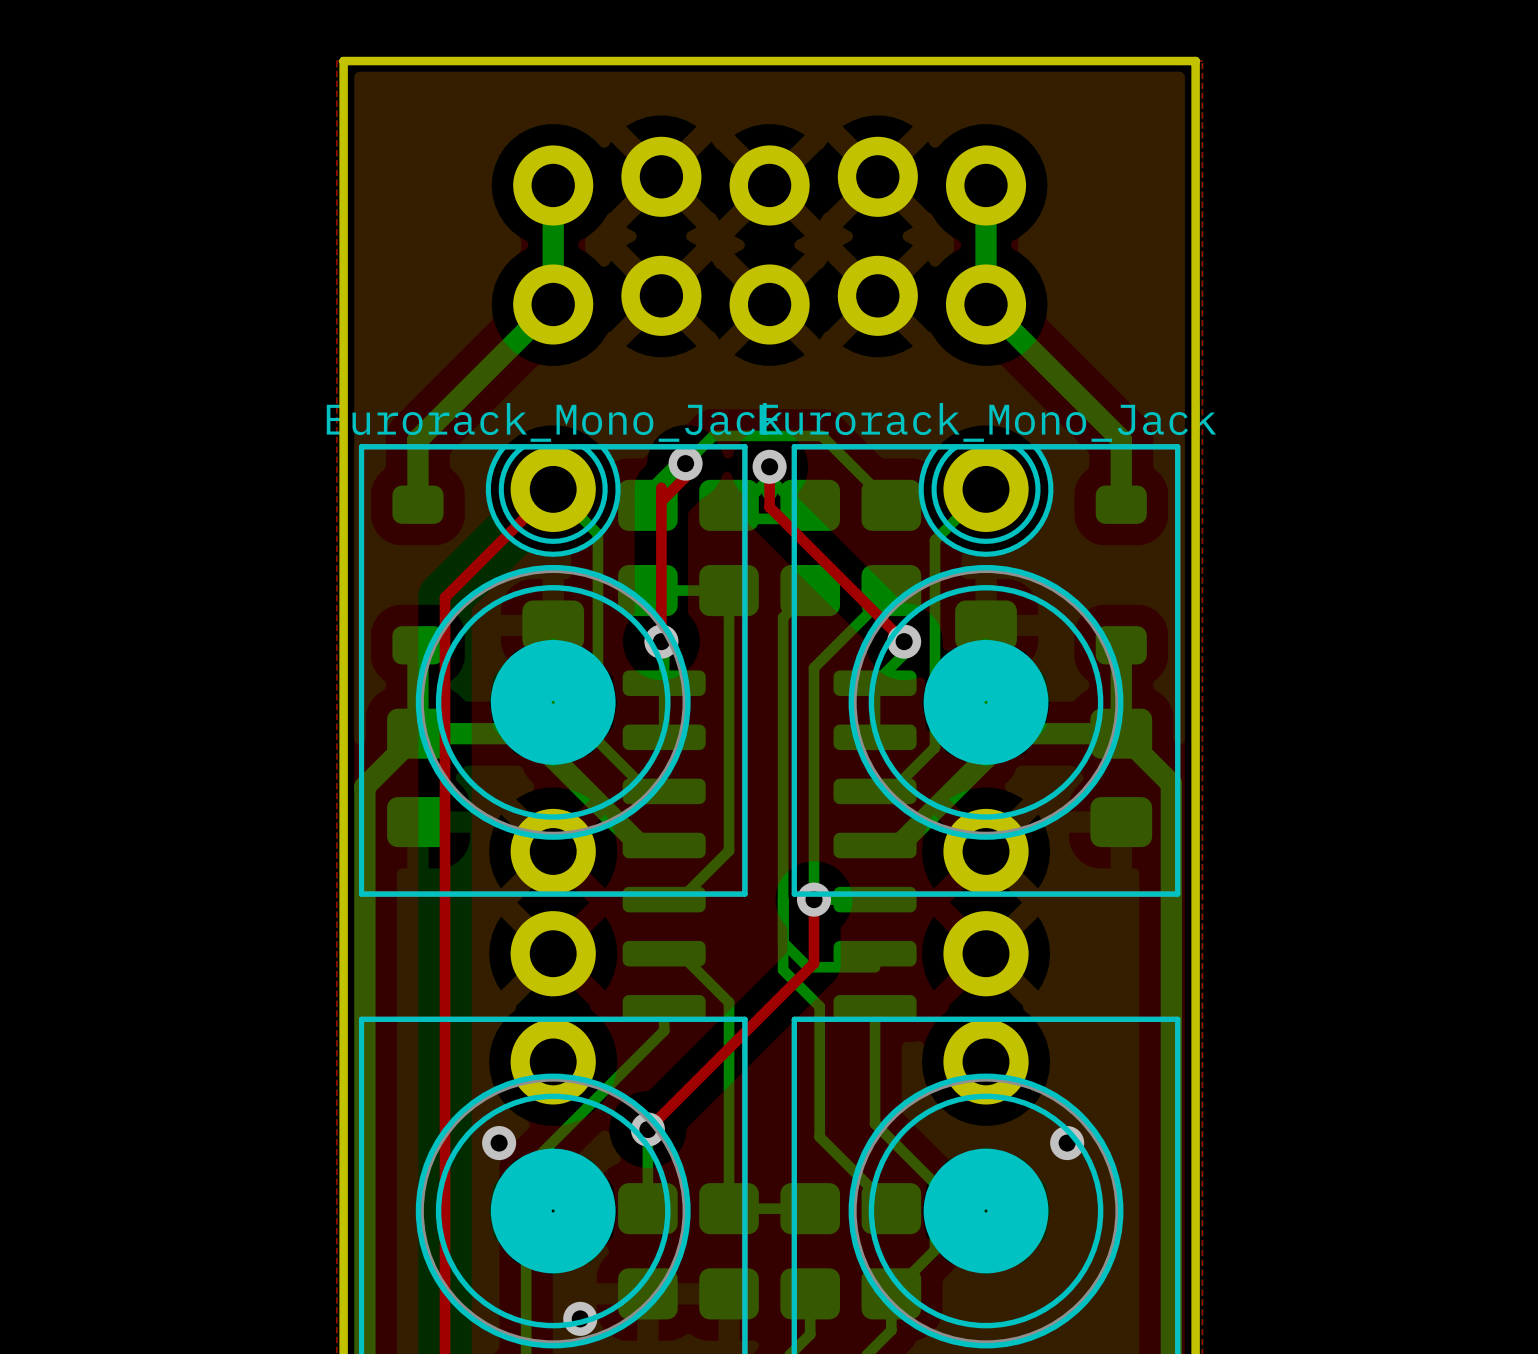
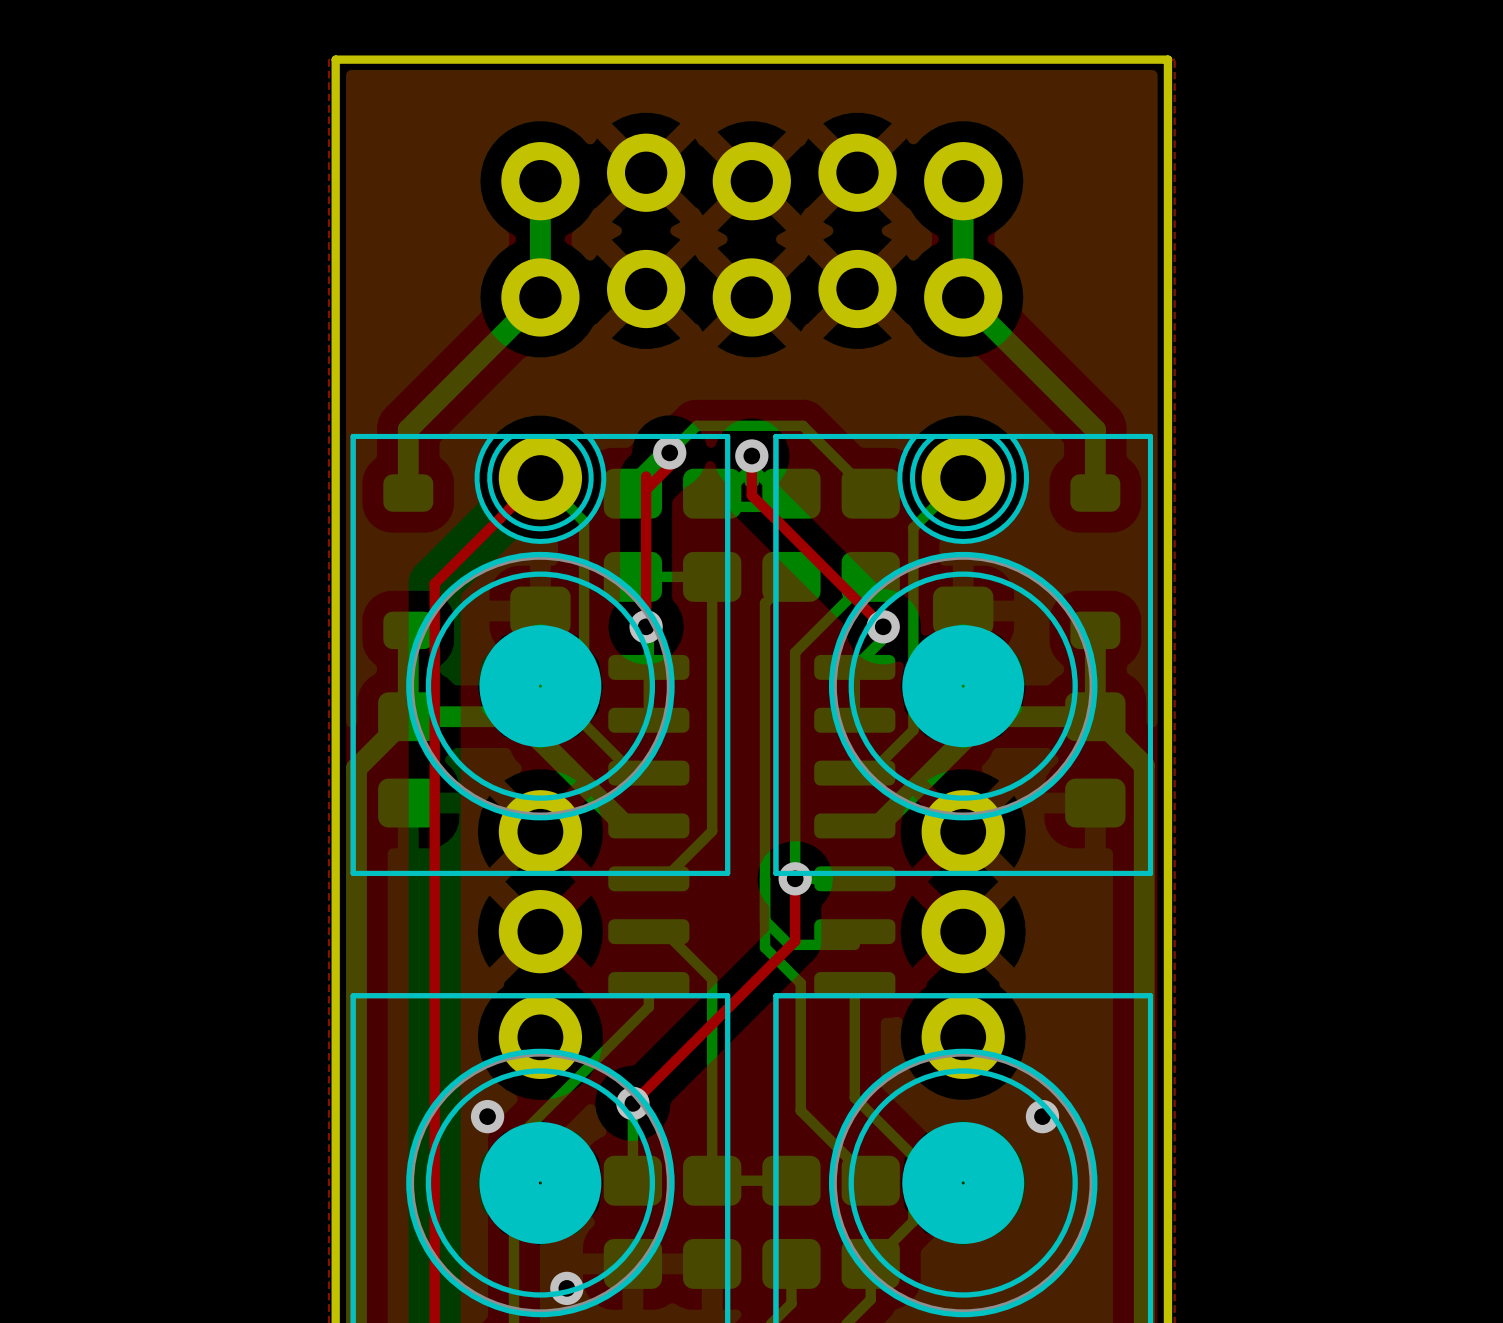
part value: Eurorack_Mono_Jack (555, 422) -> none
part value: Eurorack_Mono_Jack (987, 422) -> none

